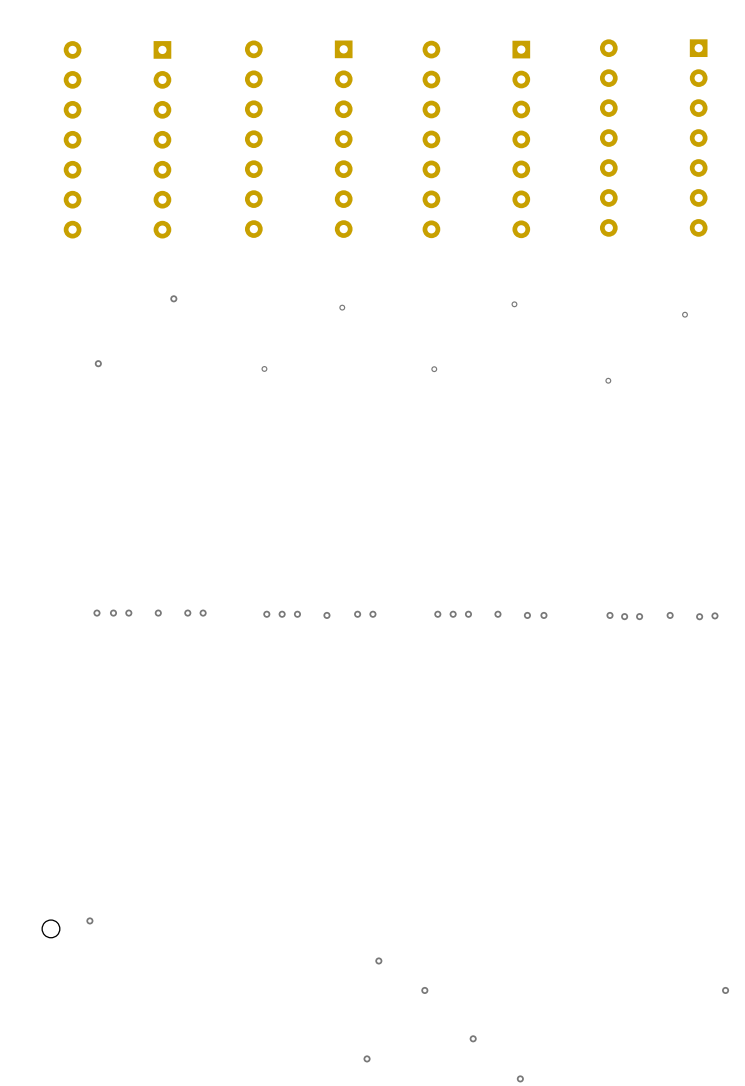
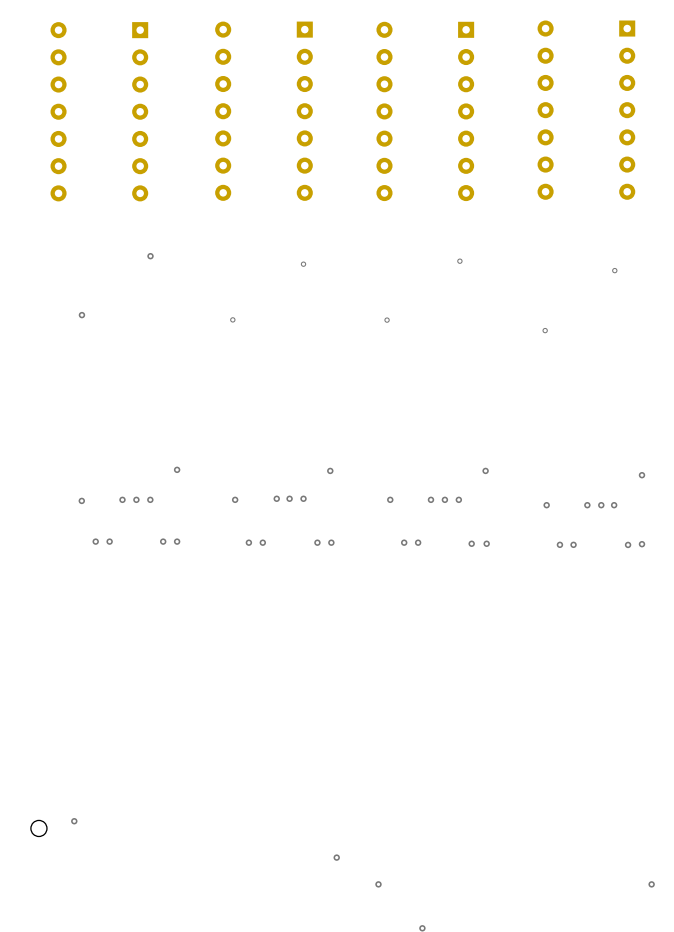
via: none -> (177, 469)
via: none -> (330, 470)
via: none -> (485, 470)
via: none -> (641, 475)
via: none -> (276, 498)
via: none -> (289, 498)
via: none -> (303, 498)
via: none -> (122, 499)
via: none -> (136, 499)
via: none -> (150, 499)
via: none -> (235, 499)
via: none -> (390, 499)
via: none -> (430, 499)
via: none -> (444, 499)
via: none -> (458, 499)
via: none -> (81, 500)
via: none -> (546, 505)
via: none -> (587, 505)
via: none -> (601, 505)
via: none -> (614, 505)
via: (96, 613) -> none
via: (158, 613) -> none
via: (266, 614) -> none
via: (437, 614) -> none
via: (497, 614) -> none
via: (326, 615) -> none
via: (609, 615) -> none
via: (670, 615) -> none

